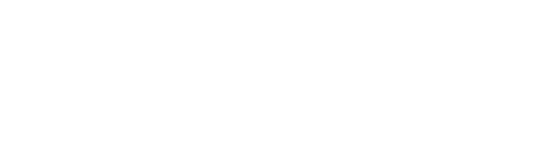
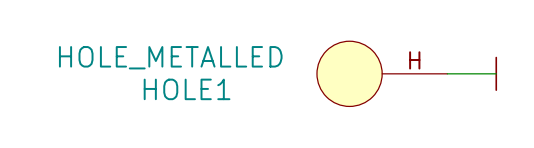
HOLE1: none -> HOLE_METALLED (382, 73)
wire: none -> (447, 73) (496, 73)
power symbol: none -> (496, 73)

